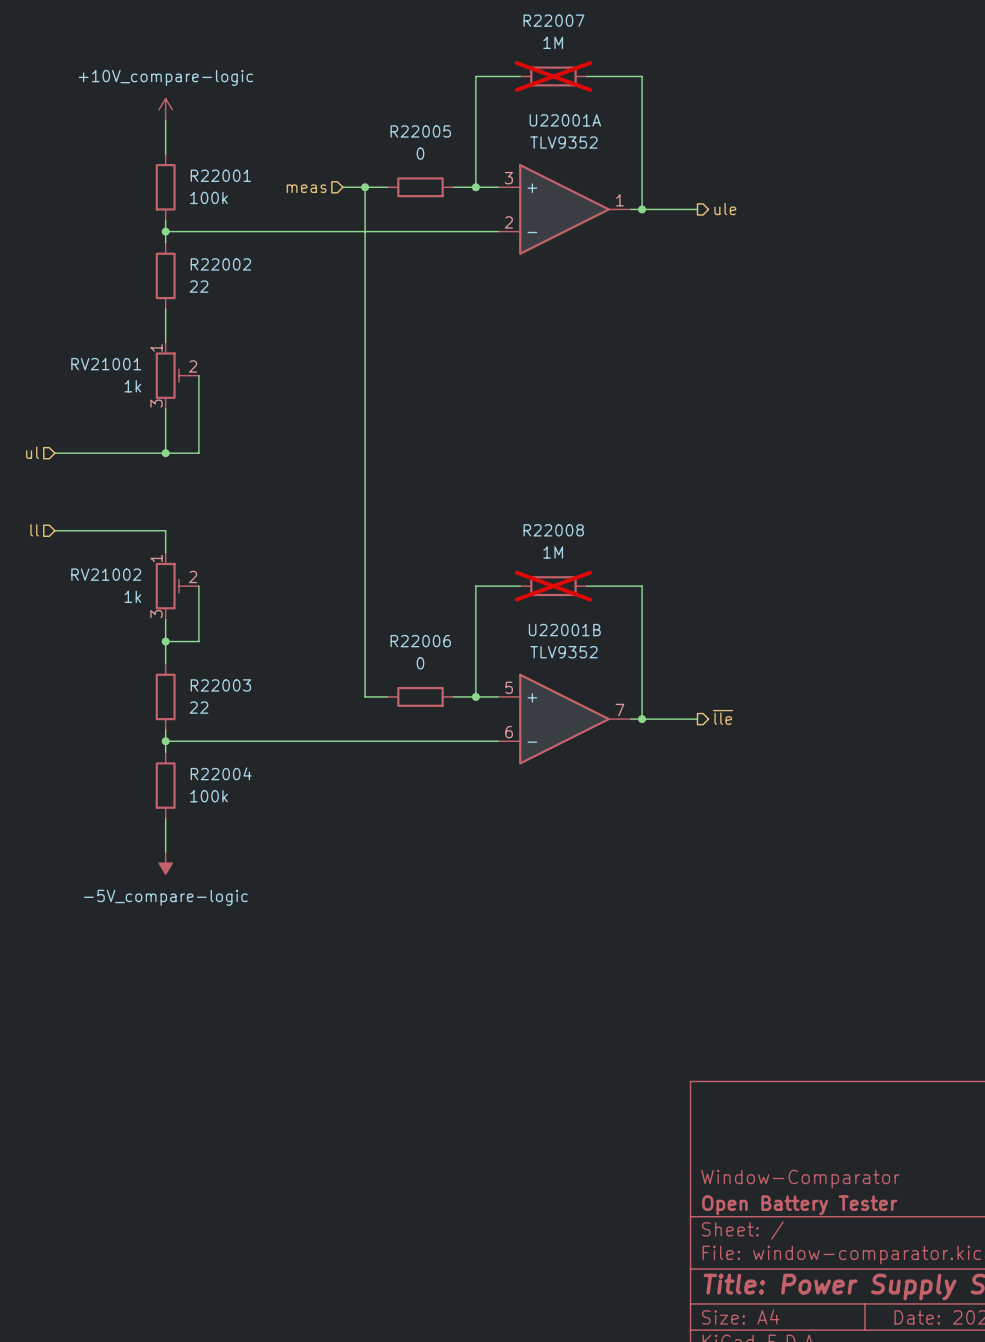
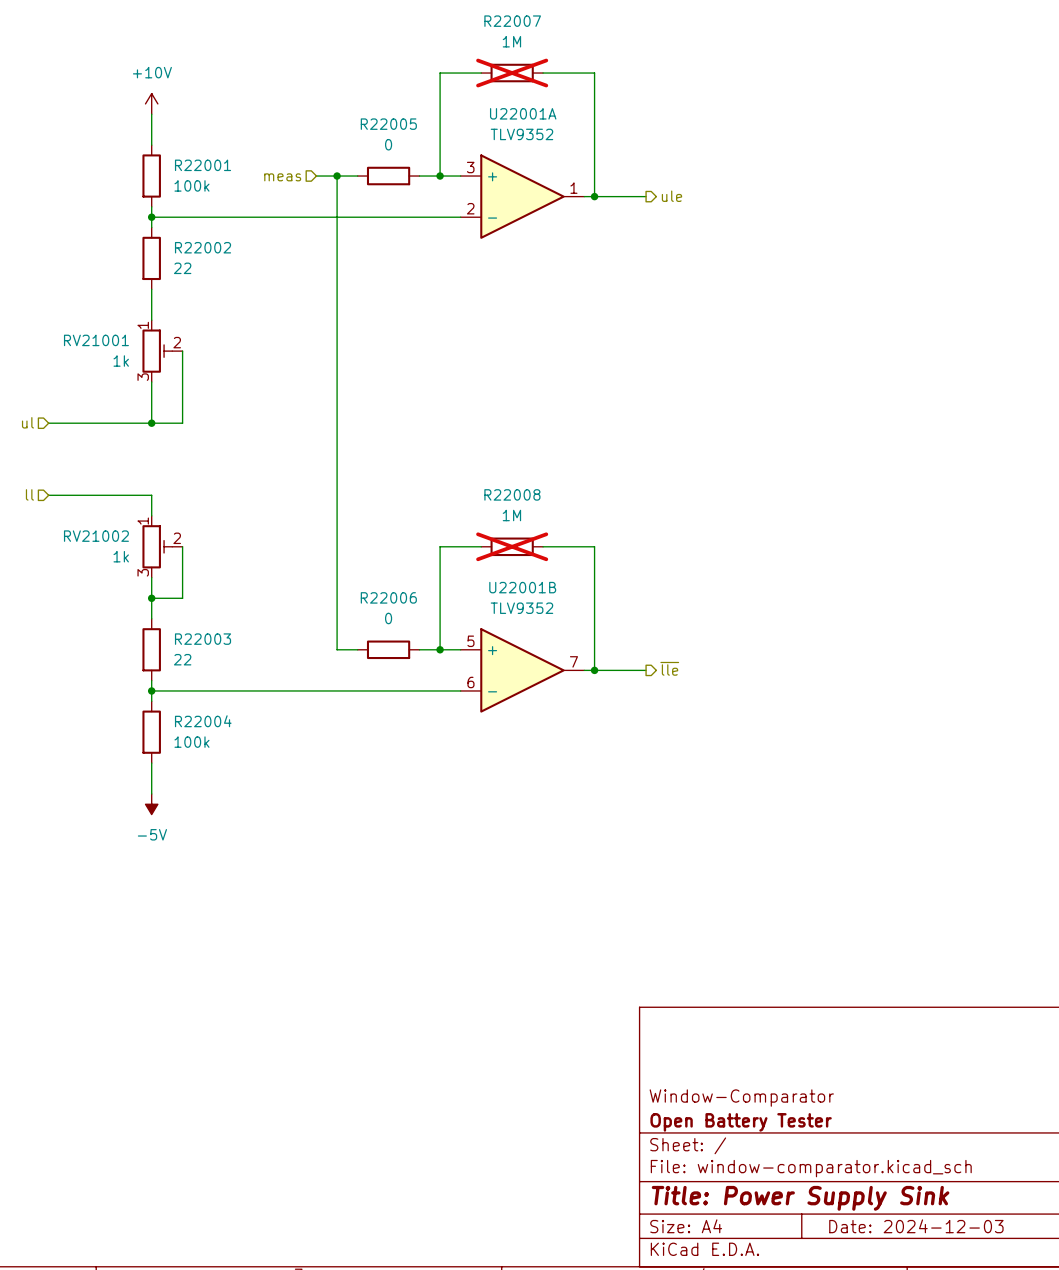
power symbol: +10V_compare-logic (165, 109) -> +10V (151, 103)
power symbol: -5V_compare-logic (165, 863) -> -5V (151, 804)

